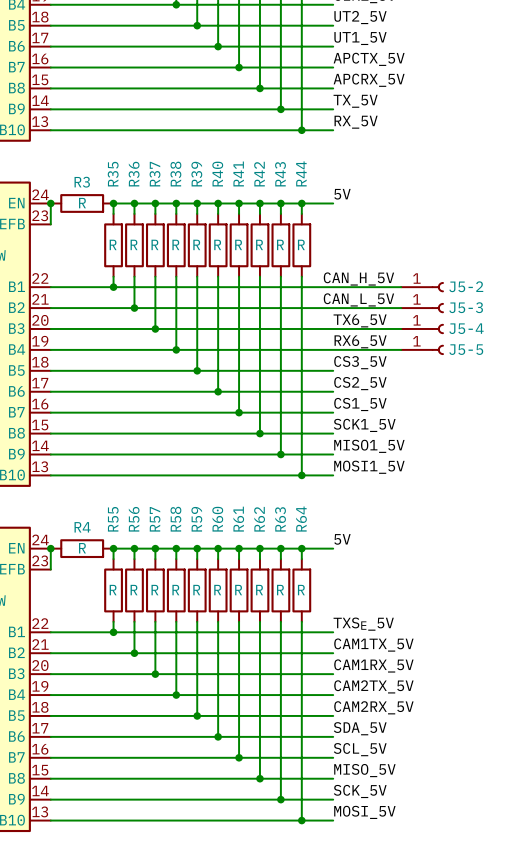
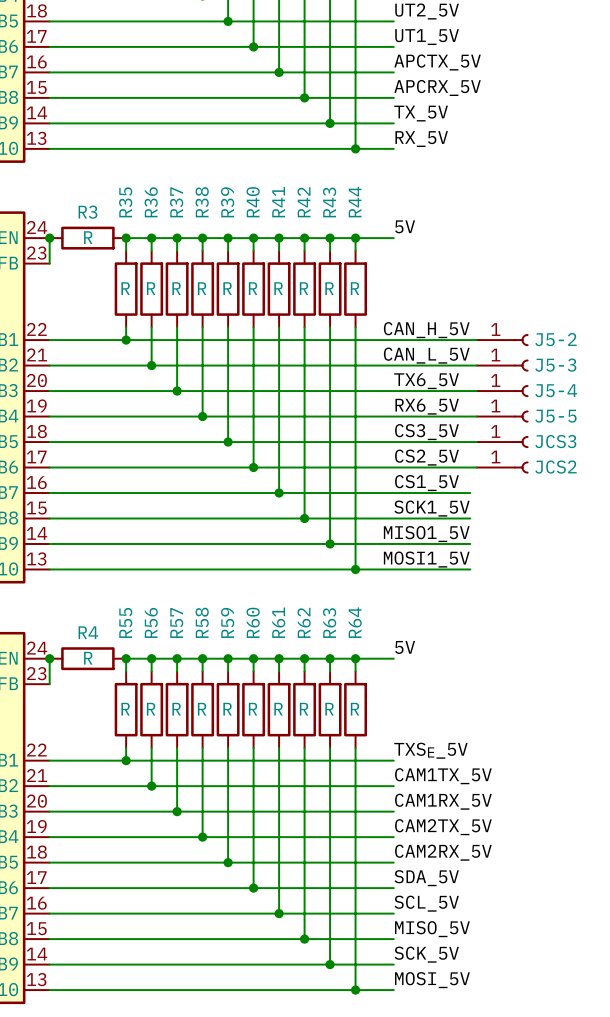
label position: CAN_H_5V (358, 279) -> CAN_H_5V (426, 330)
label position: CAN_L_5V (358, 299) -> CAN_L_5V (426, 355)
wire: none -> (393, 442) (476, 442)
JCS3: none -> (502, 442)
wire: none -> (393, 467) (476, 467)
JCS2: none -> (502, 467)
wire: none -> (393, 493) (470, 493)
label position: SCK1_5V (364, 425) -> SCK1_5V (432, 508)
wire: none -> (393, 518) (470, 518)
label position: MISO1_5V (369, 446) -> MISO1_5V (426, 534)
wire: none -> (393, 543) (470, 543)
label position: MOSI1_5V (369, 467) -> MOSI1_5V (426, 559)
wire: none -> (393, 569) (470, 569)

